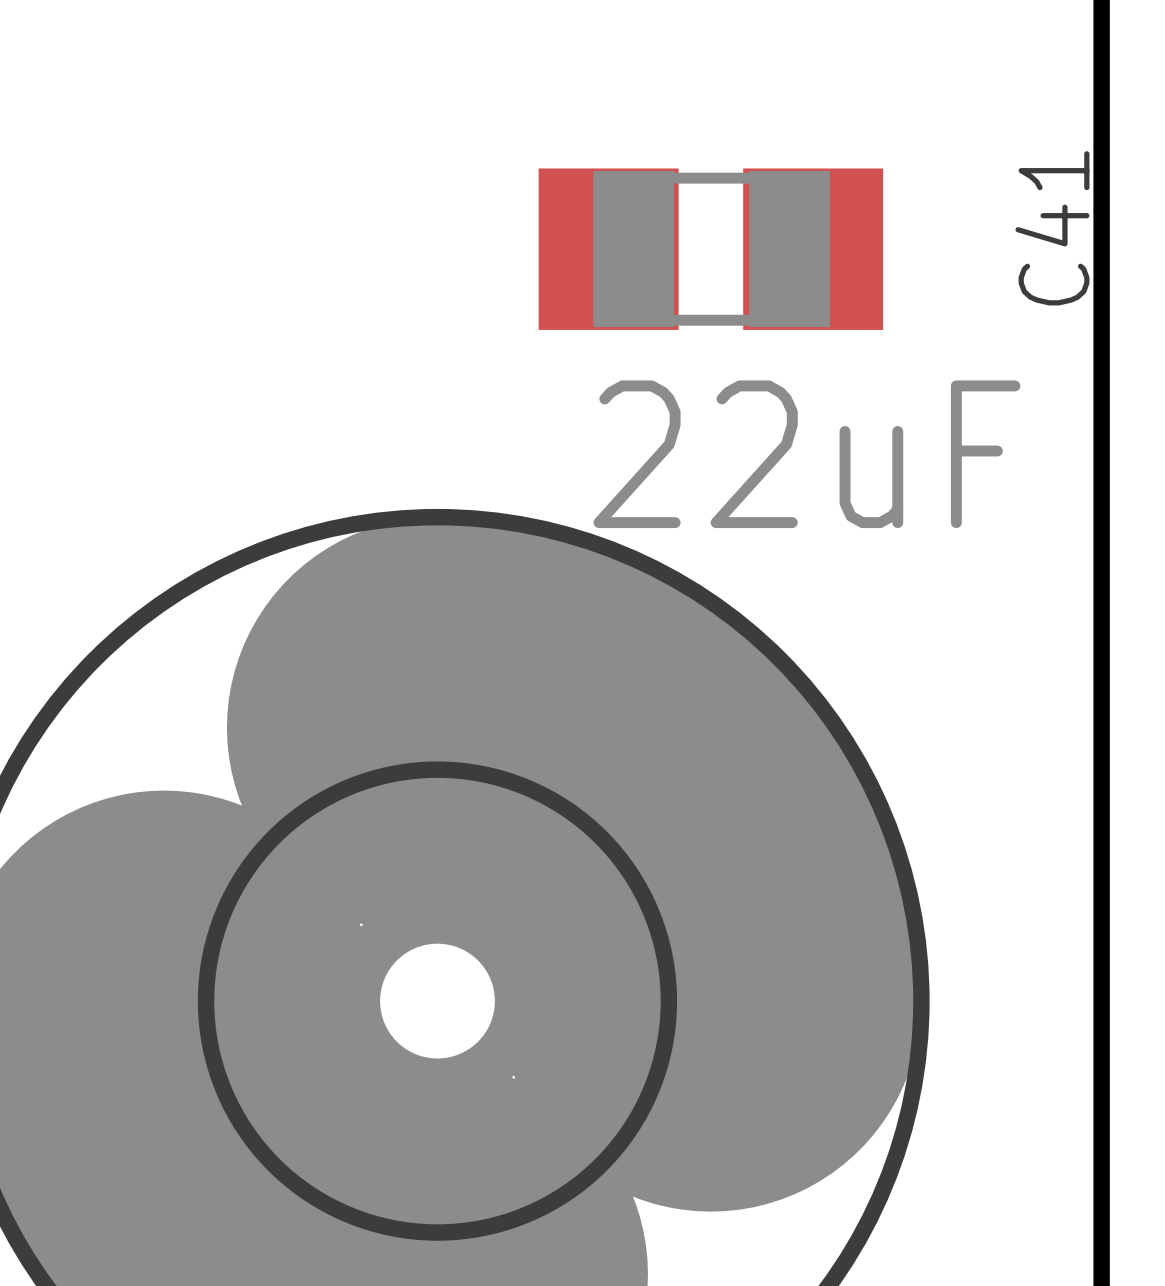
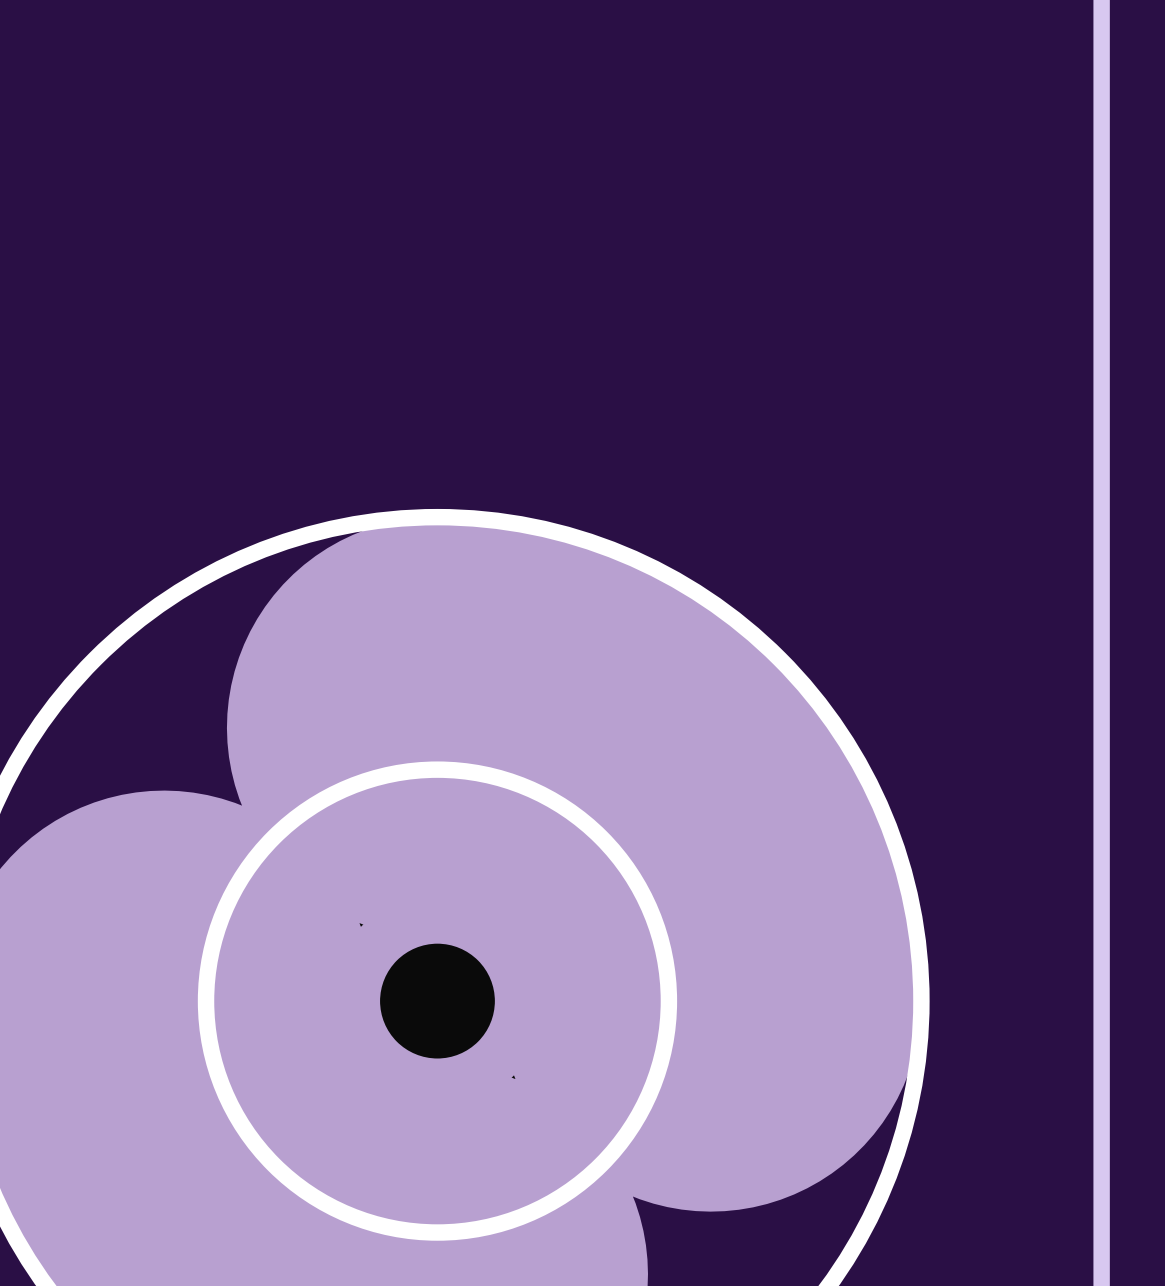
C41: 22uF (710, 249) -> none

